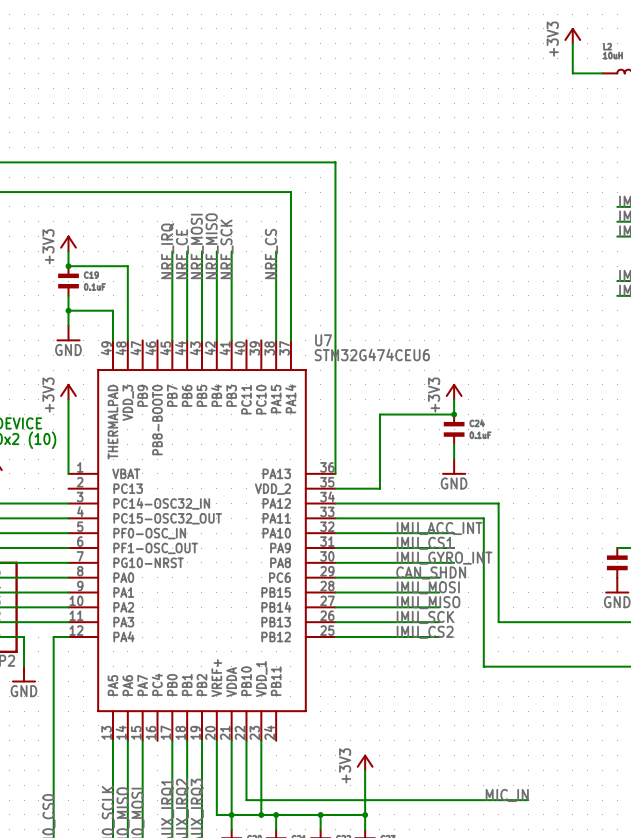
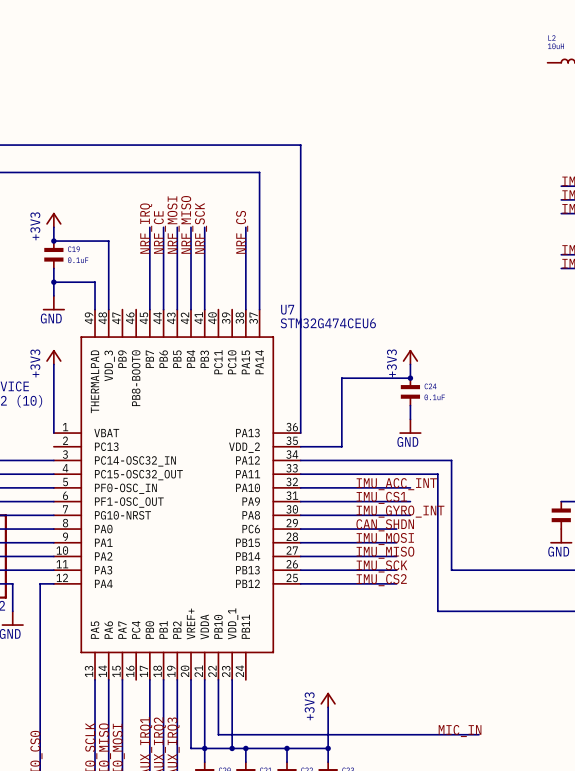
power symbol: +3V3 (572, 35) -> none
wire: (572, 43) (572, 73) (602, 73) -> none

